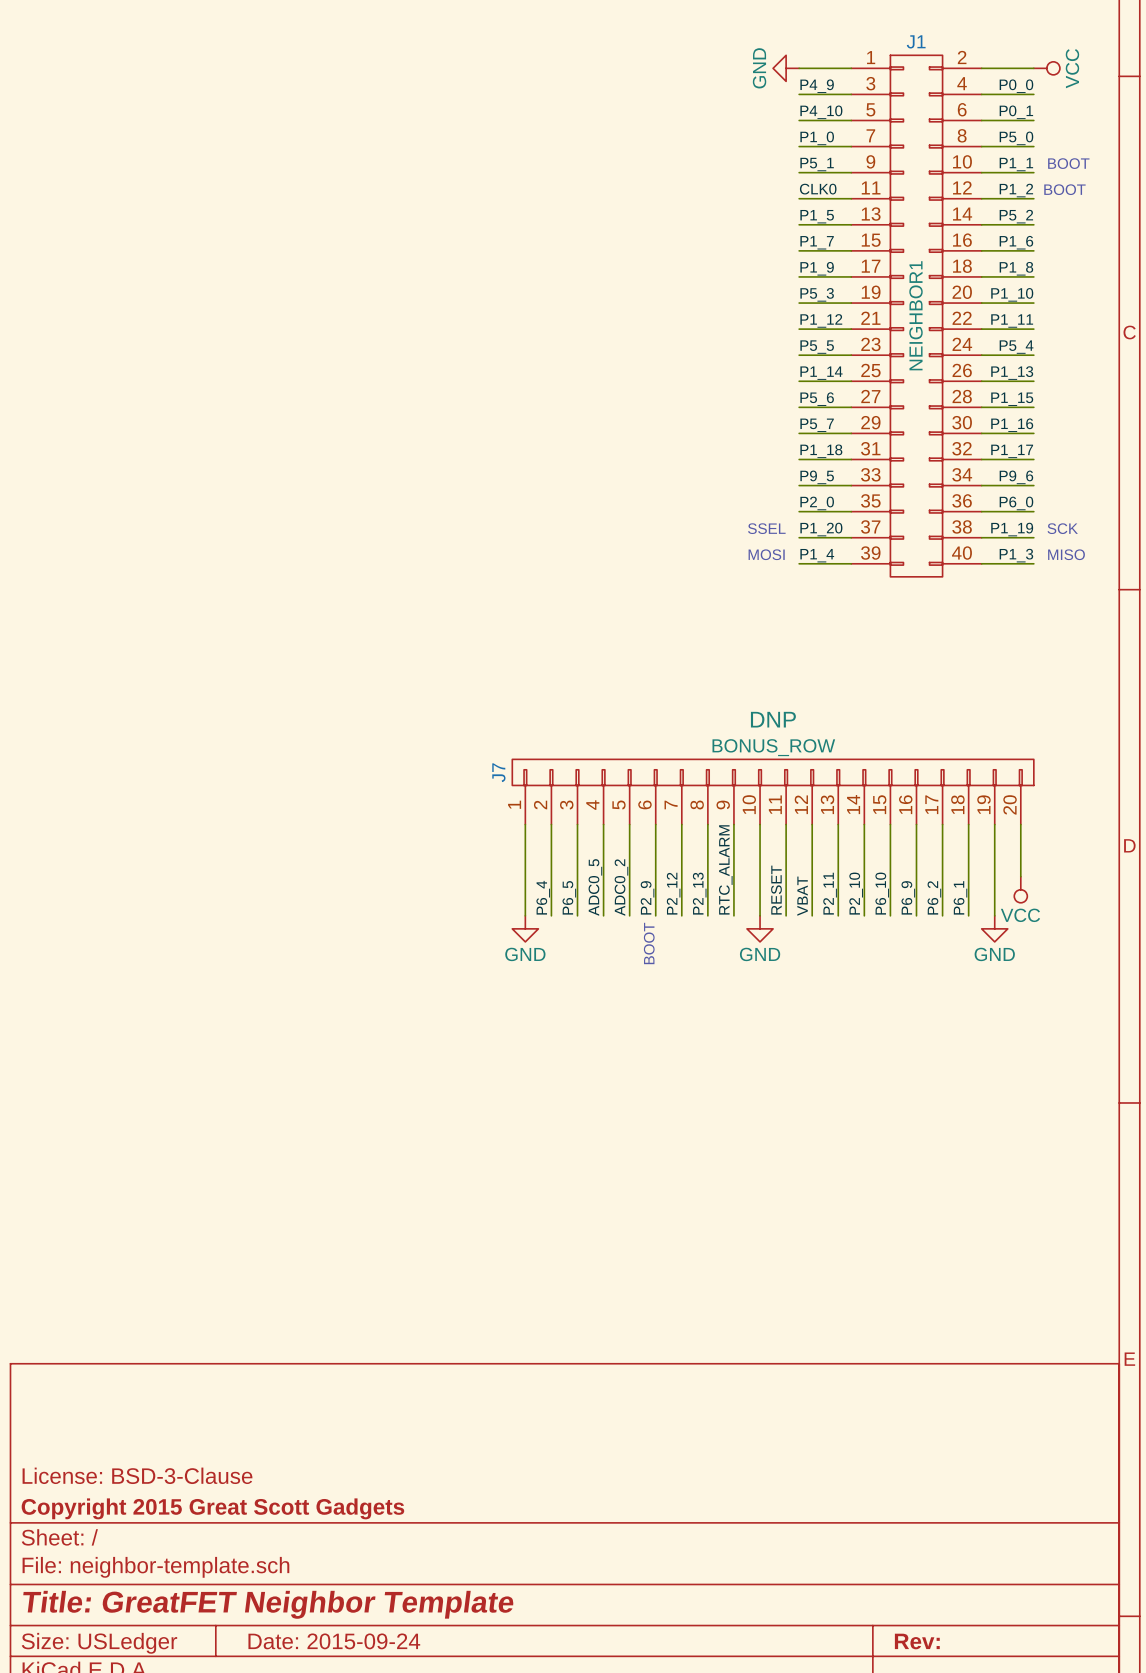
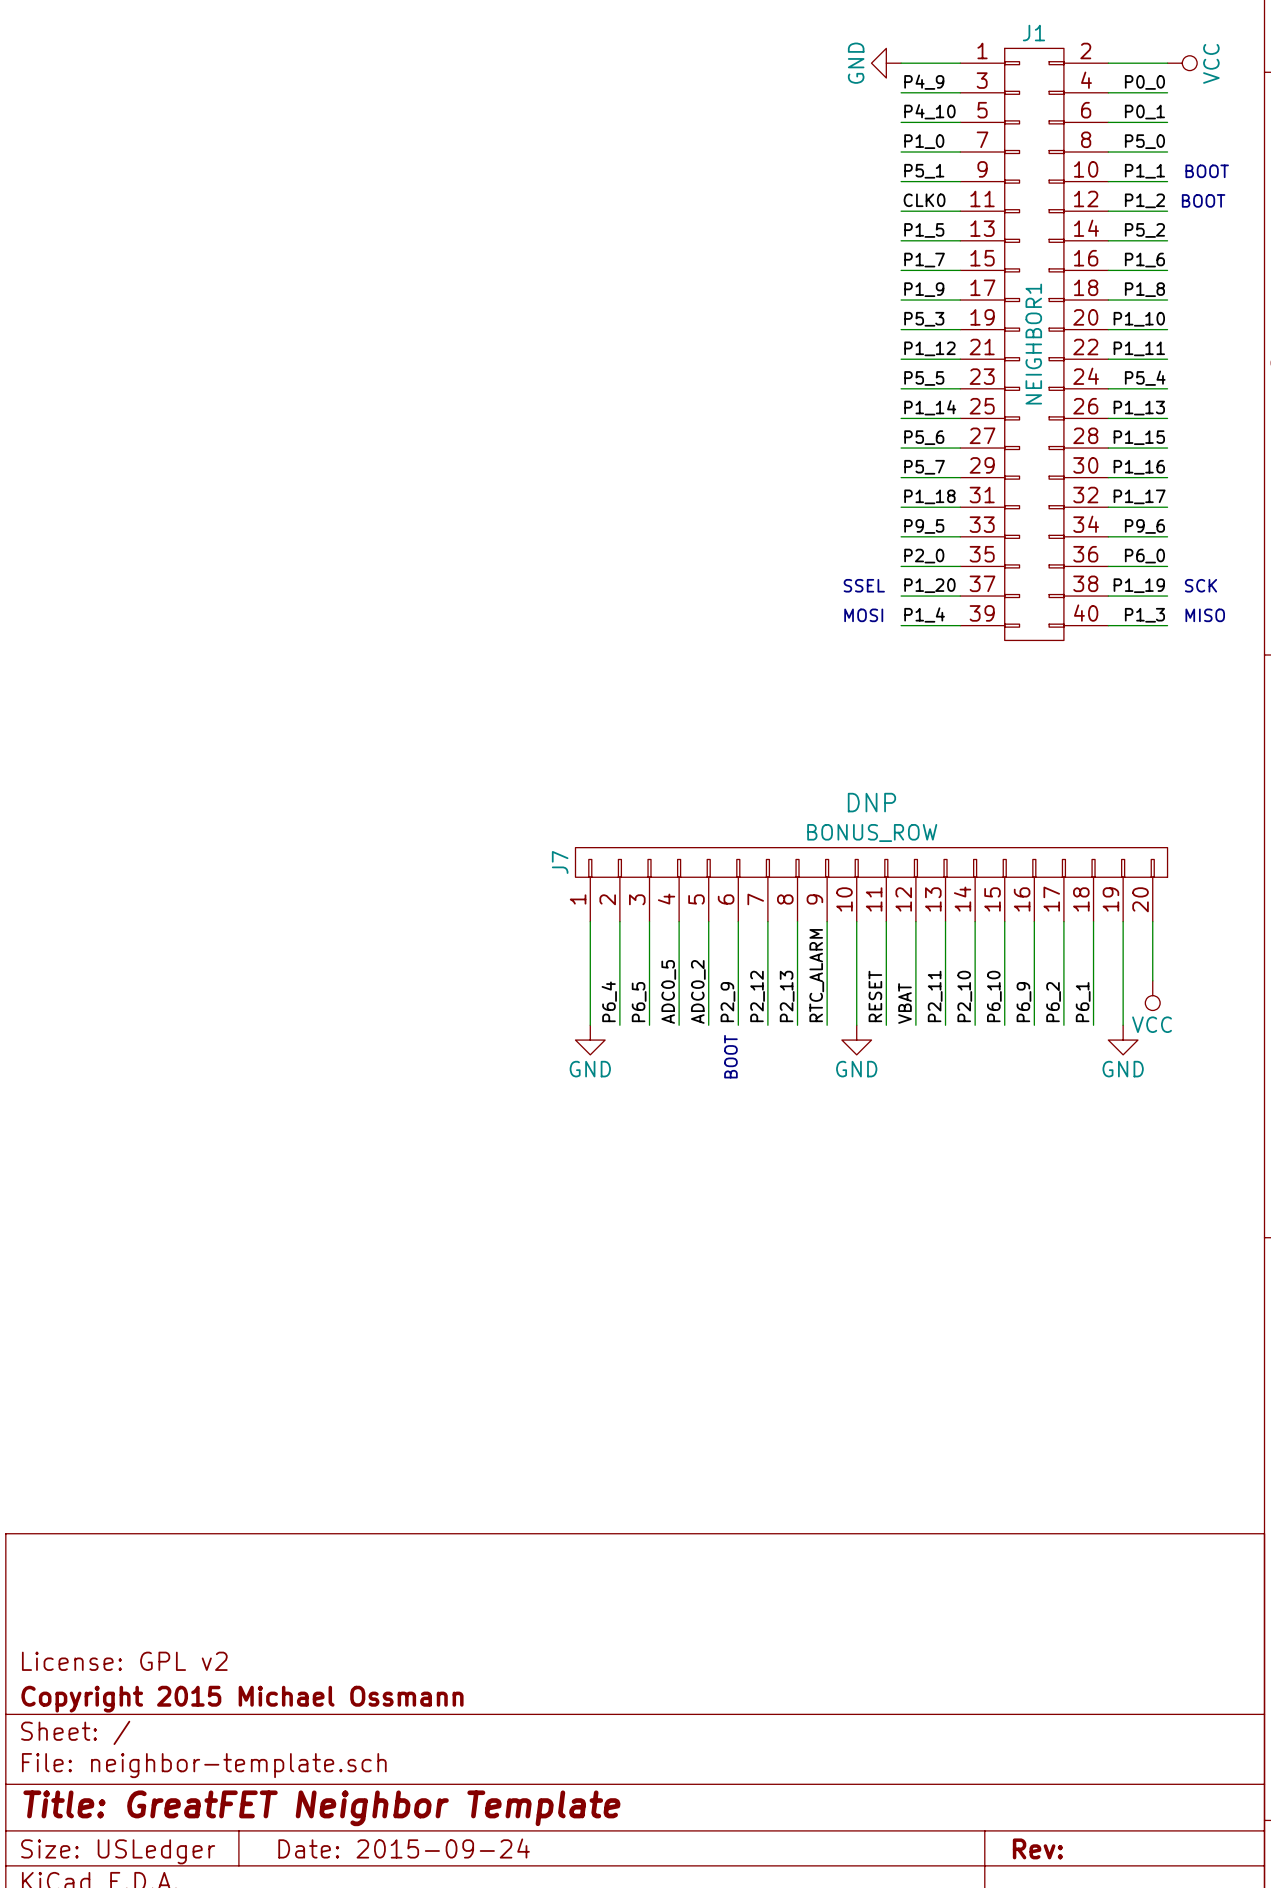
title block: License: BSD-3-Clause (137, 1475) -> License: GPL v2 (124, 1661)
title block: Copyright 2015 Great Scott Gadgets (212, 1508) -> Copyright 2015 Michael Ossmann (242, 1699)

